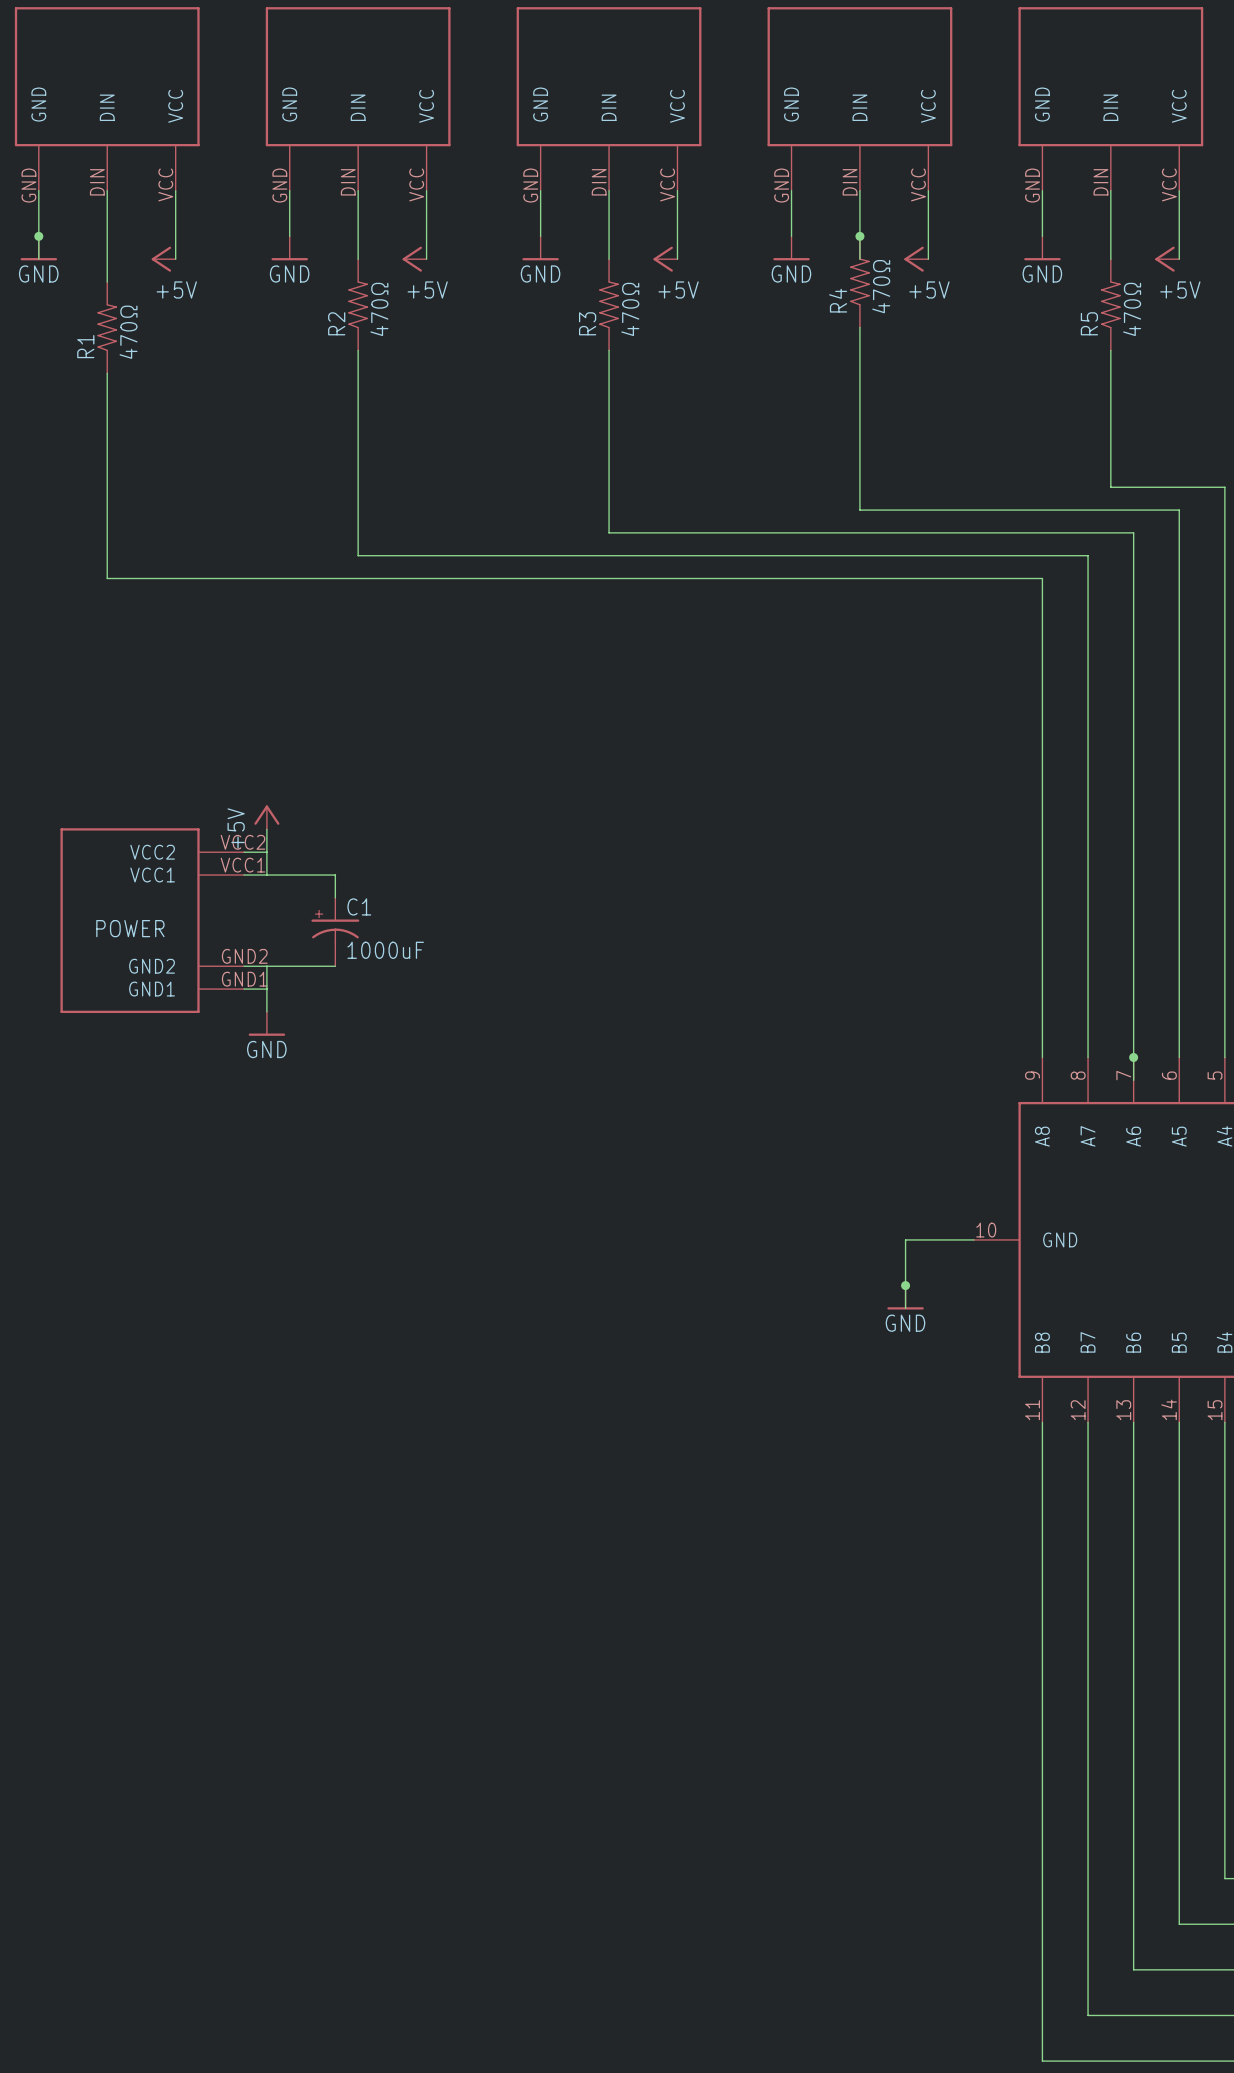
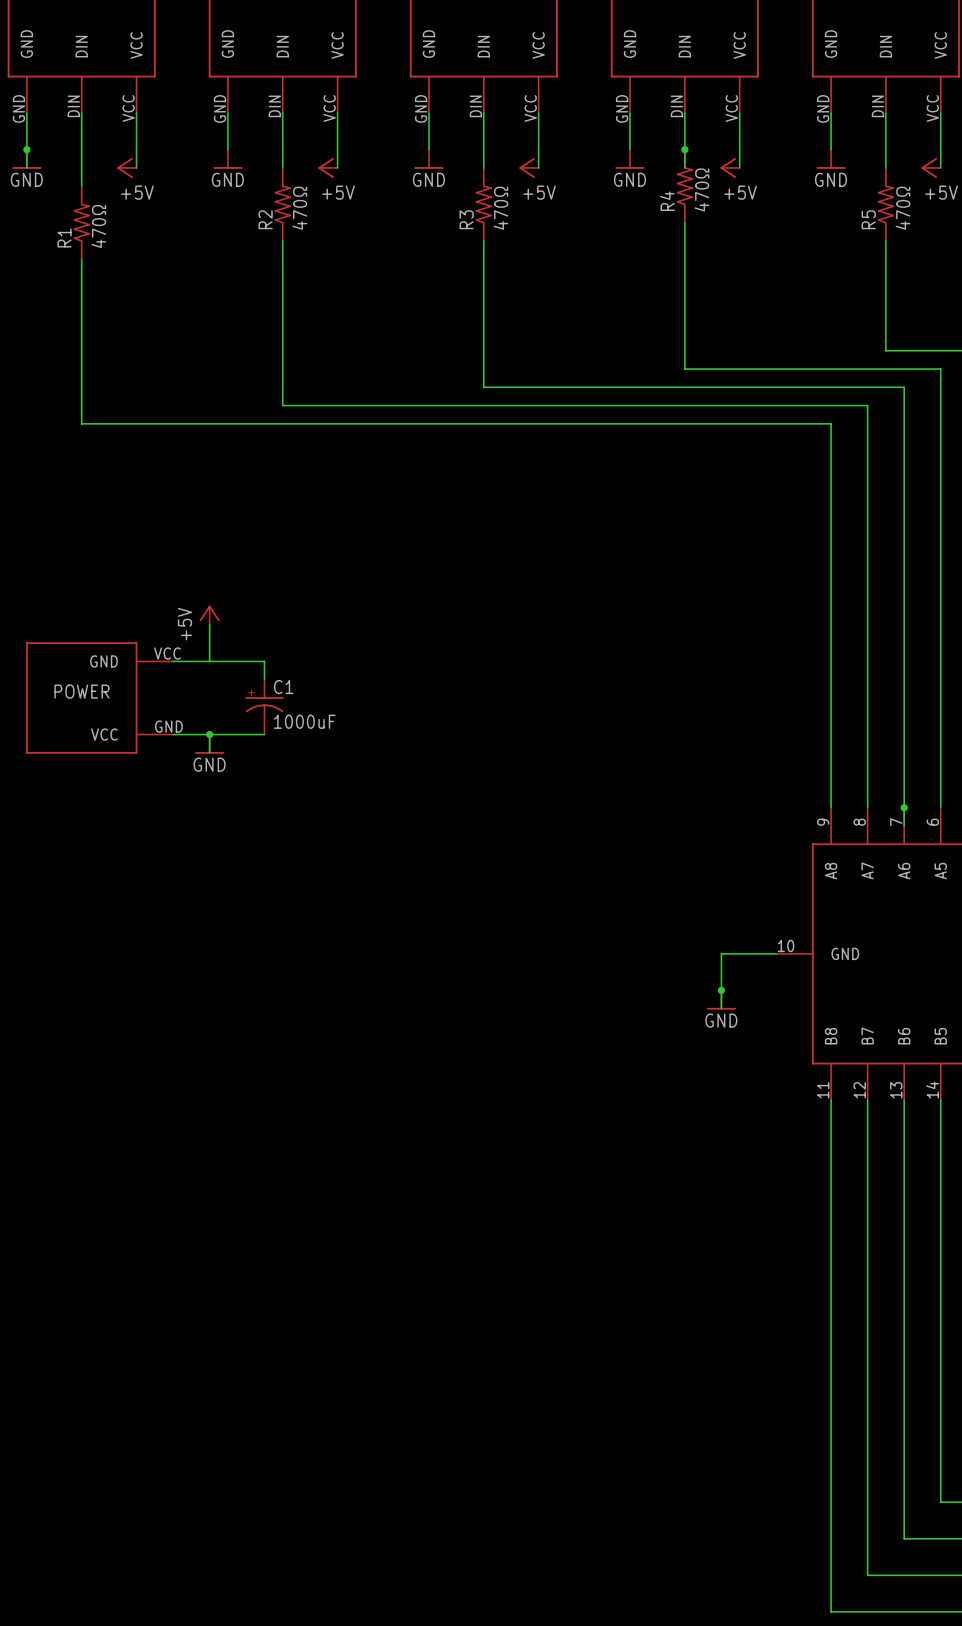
POWER: none -> (99, 698)
POWER: (152, 920) -> none
junction: none -> (209, 734)
power symbol position: GND (266, 1023) -> GND (209, 744)

